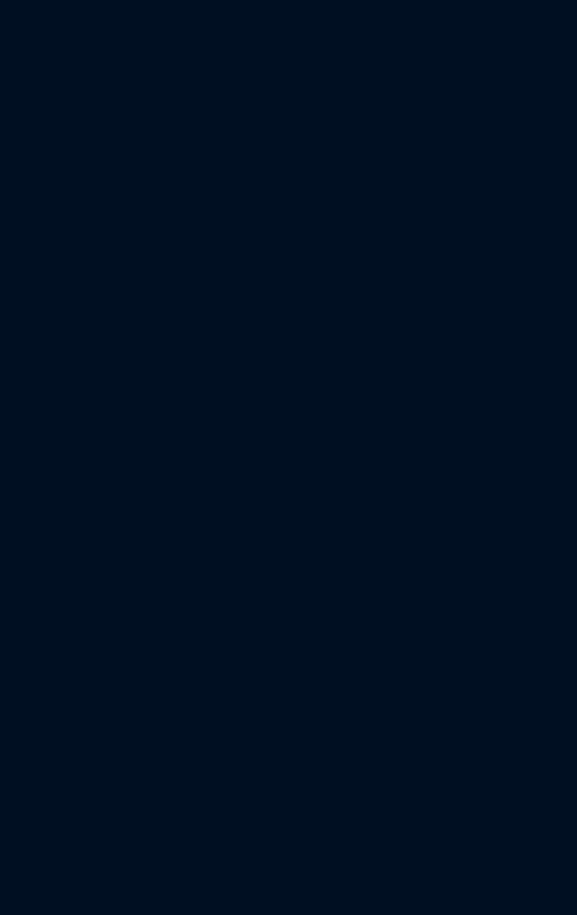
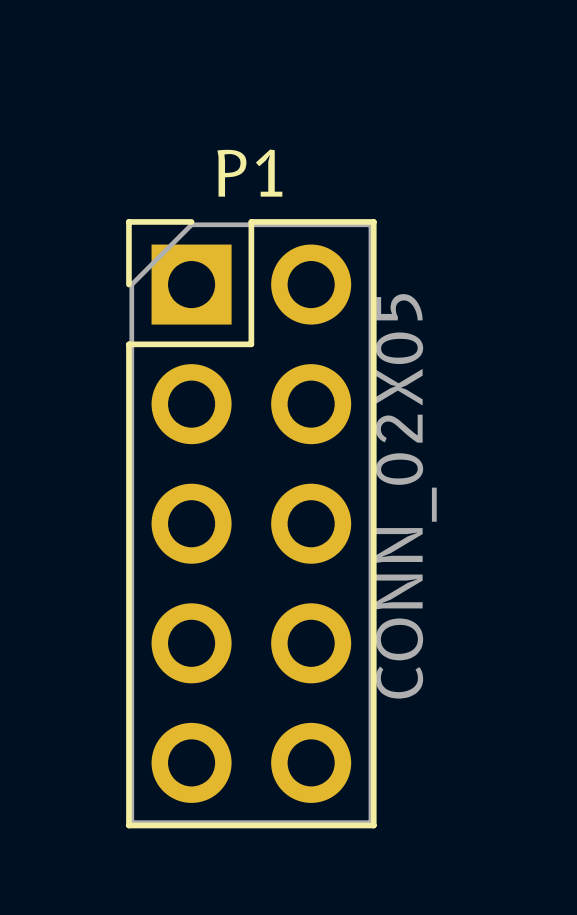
P1: none -> CONN_02X05 (251, 523)

